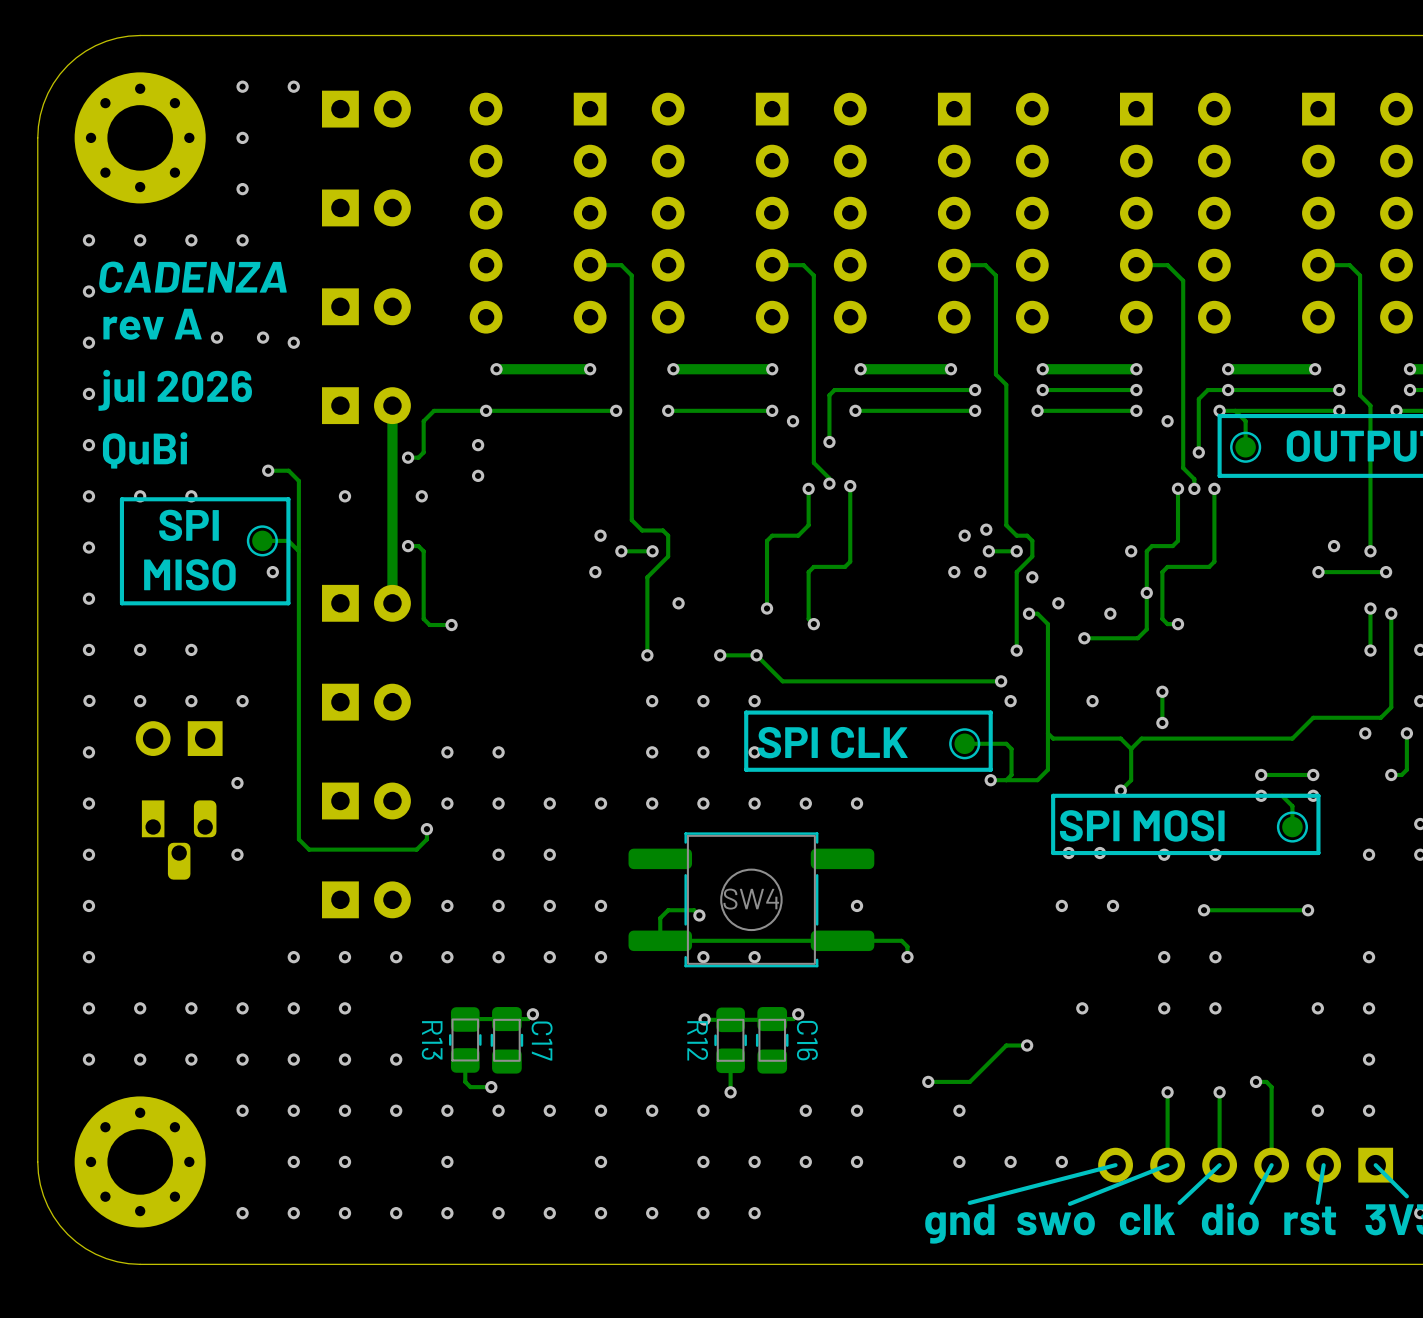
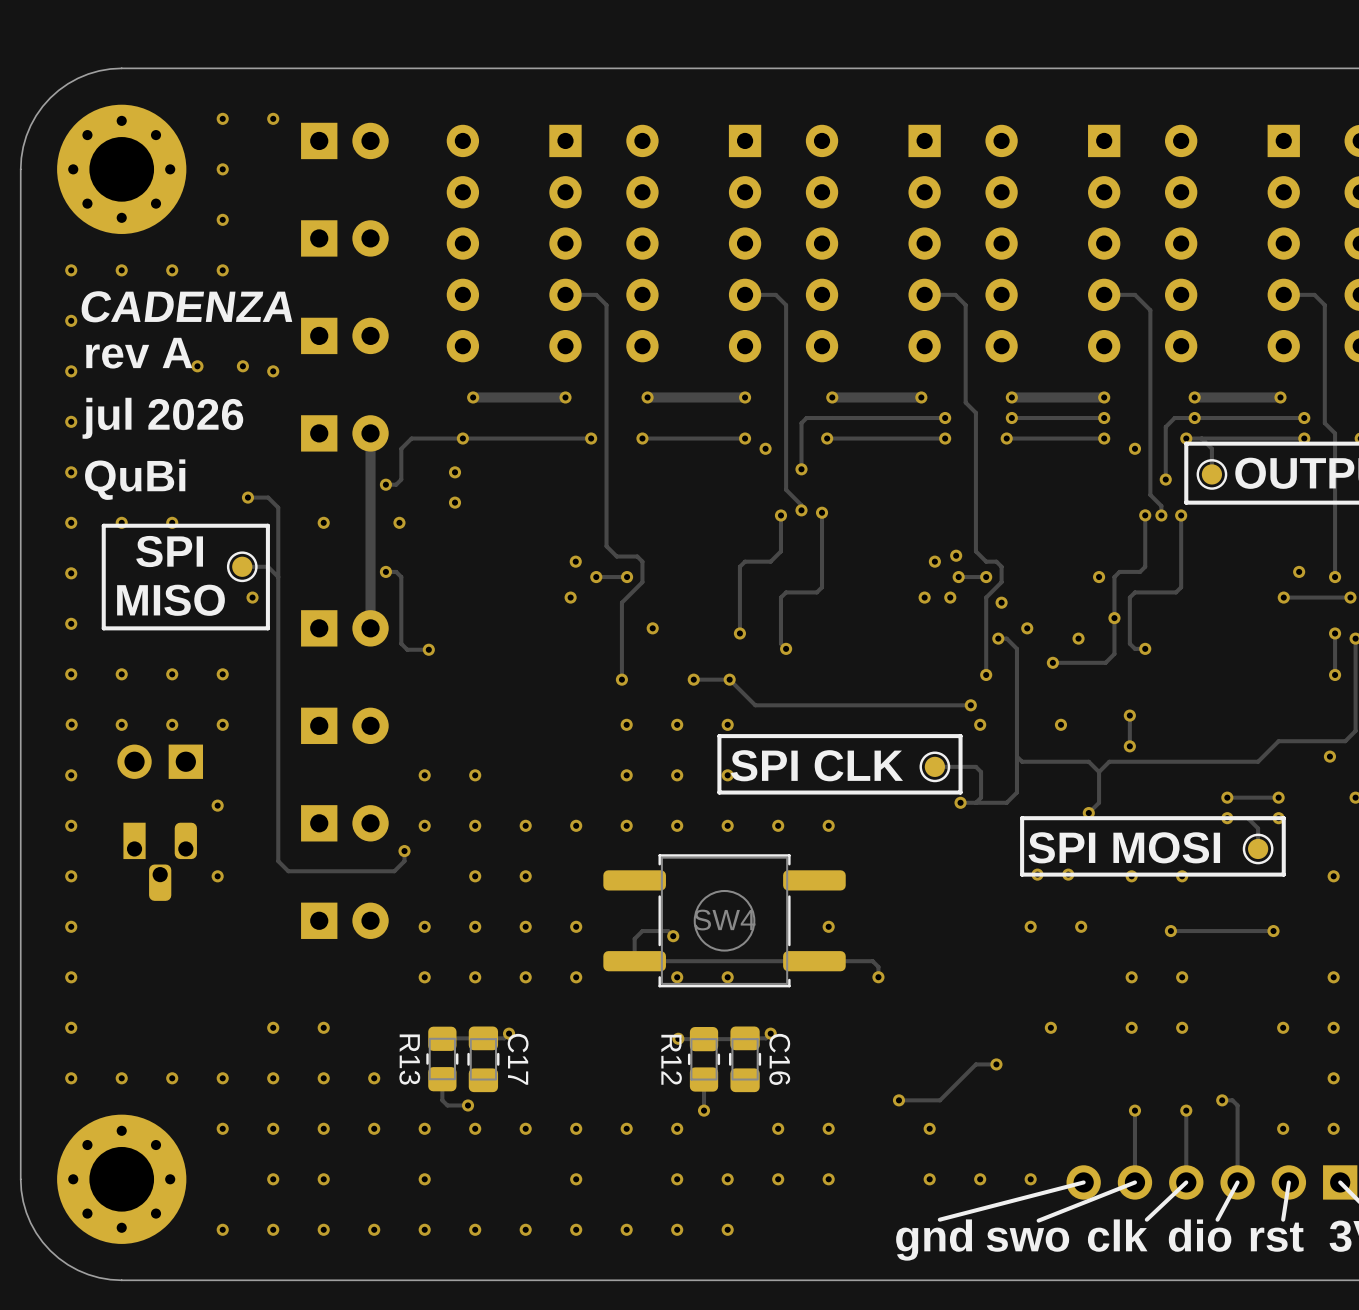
via: none -> (222, 674)
via: (293, 957) -> none
via: (344, 957) -> none
via: (396, 957) -> none
via: (140, 1008) -> none
via: (191, 1008) -> none
via: (242, 1008) -> none

